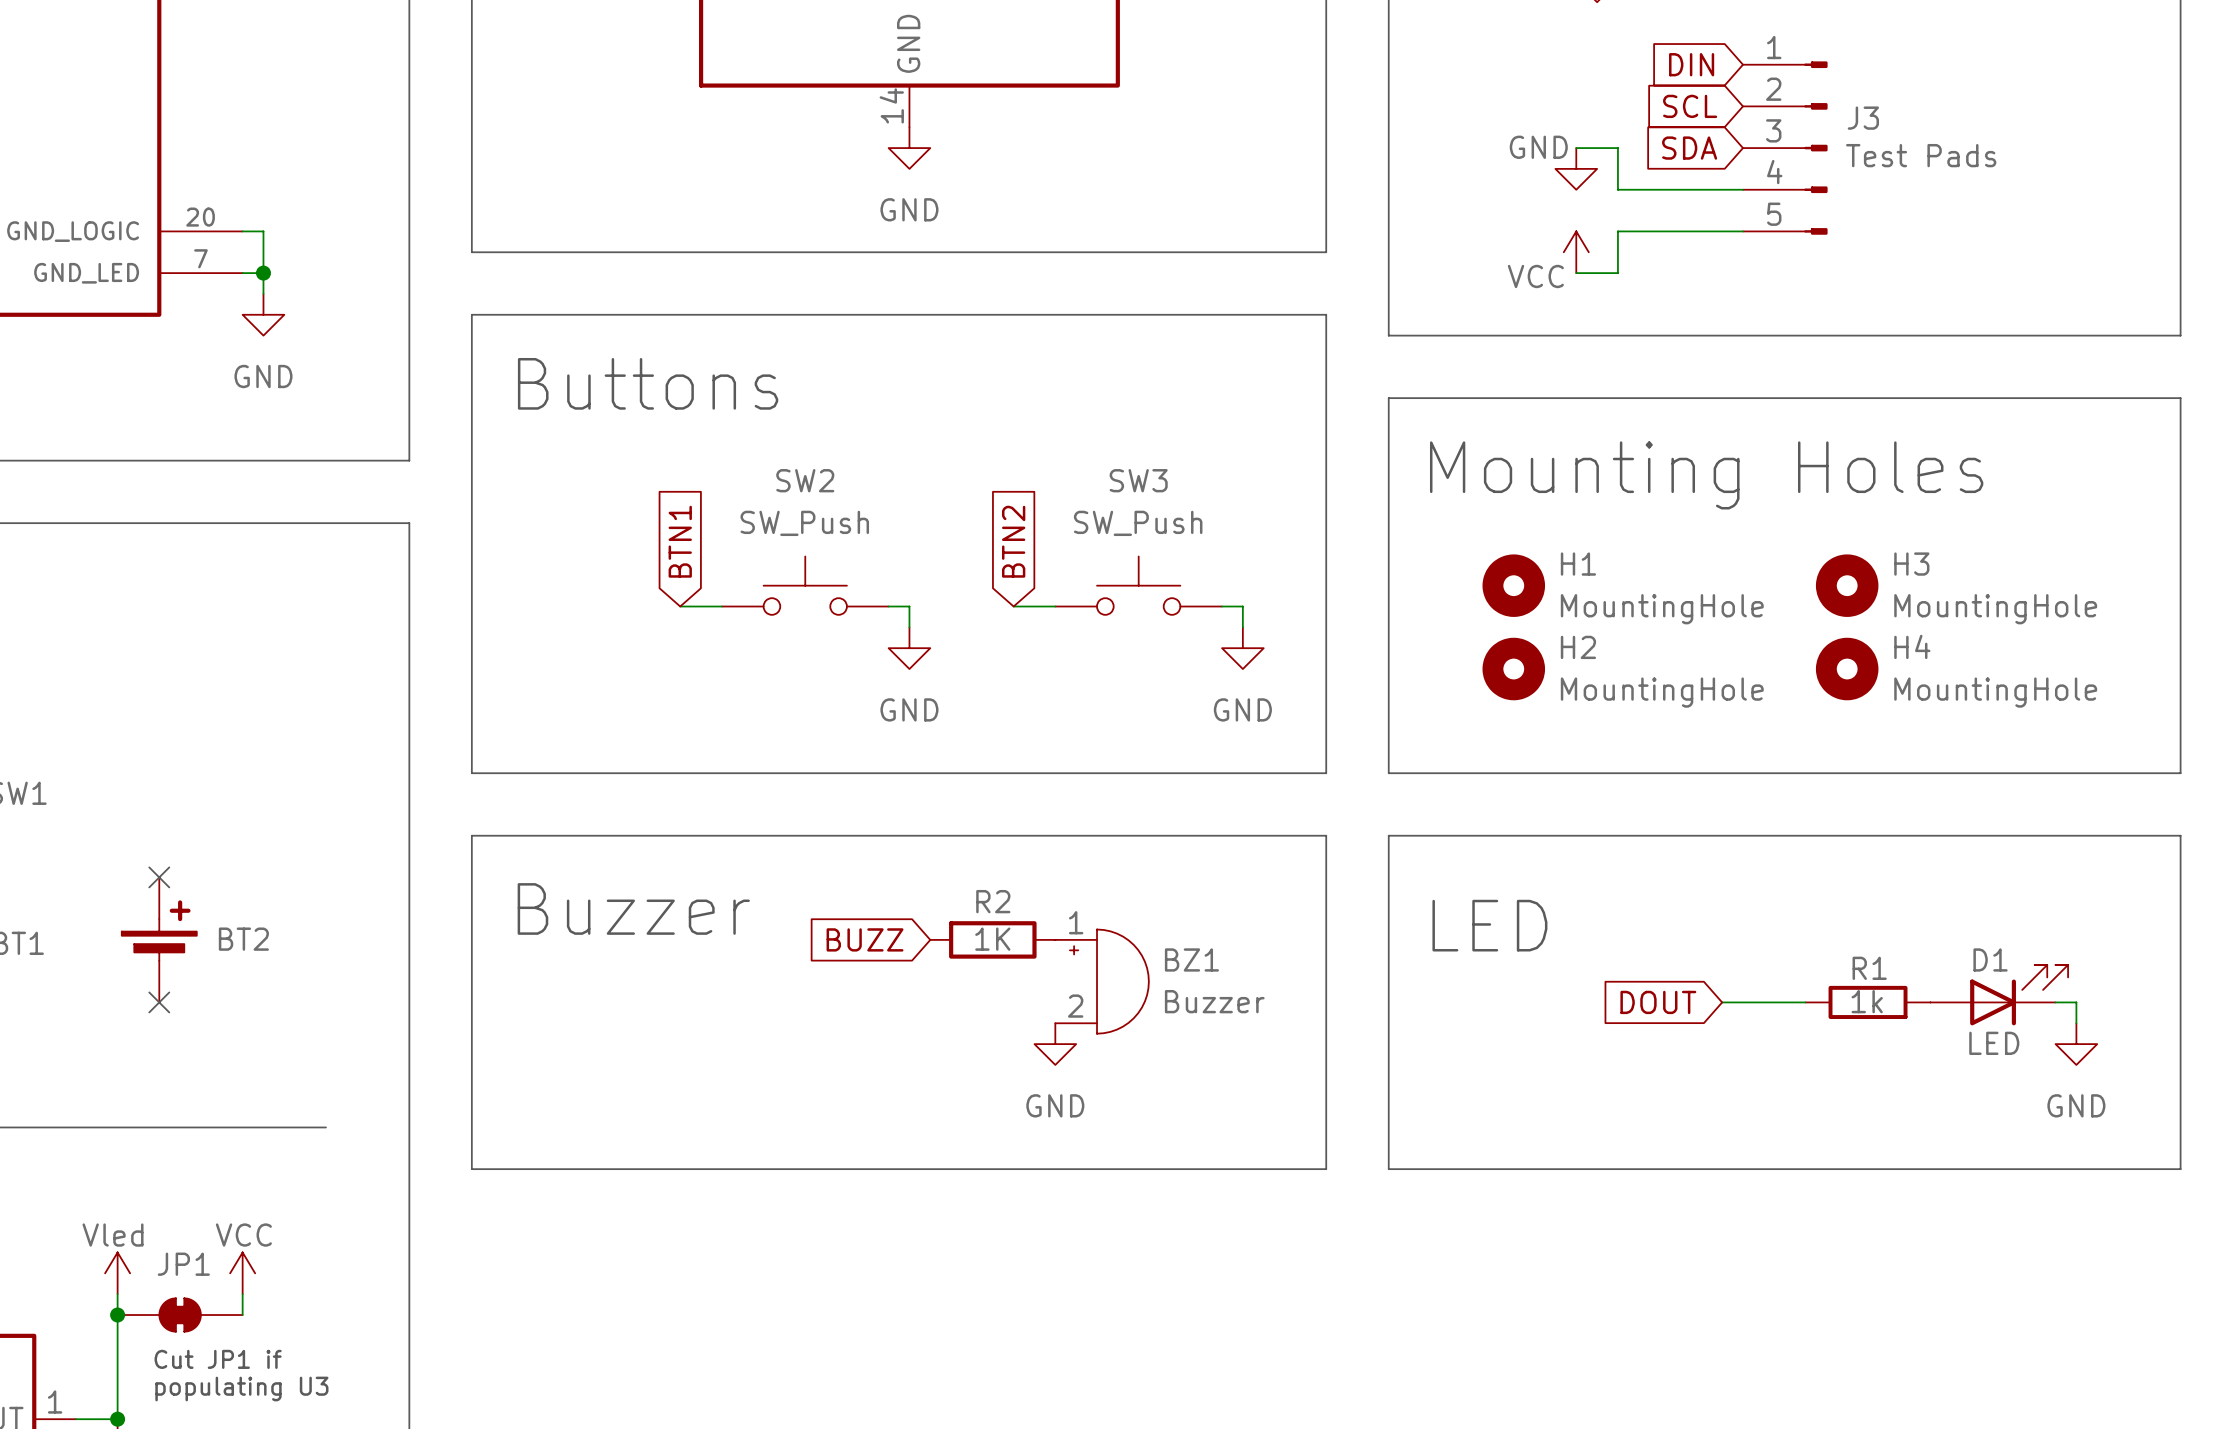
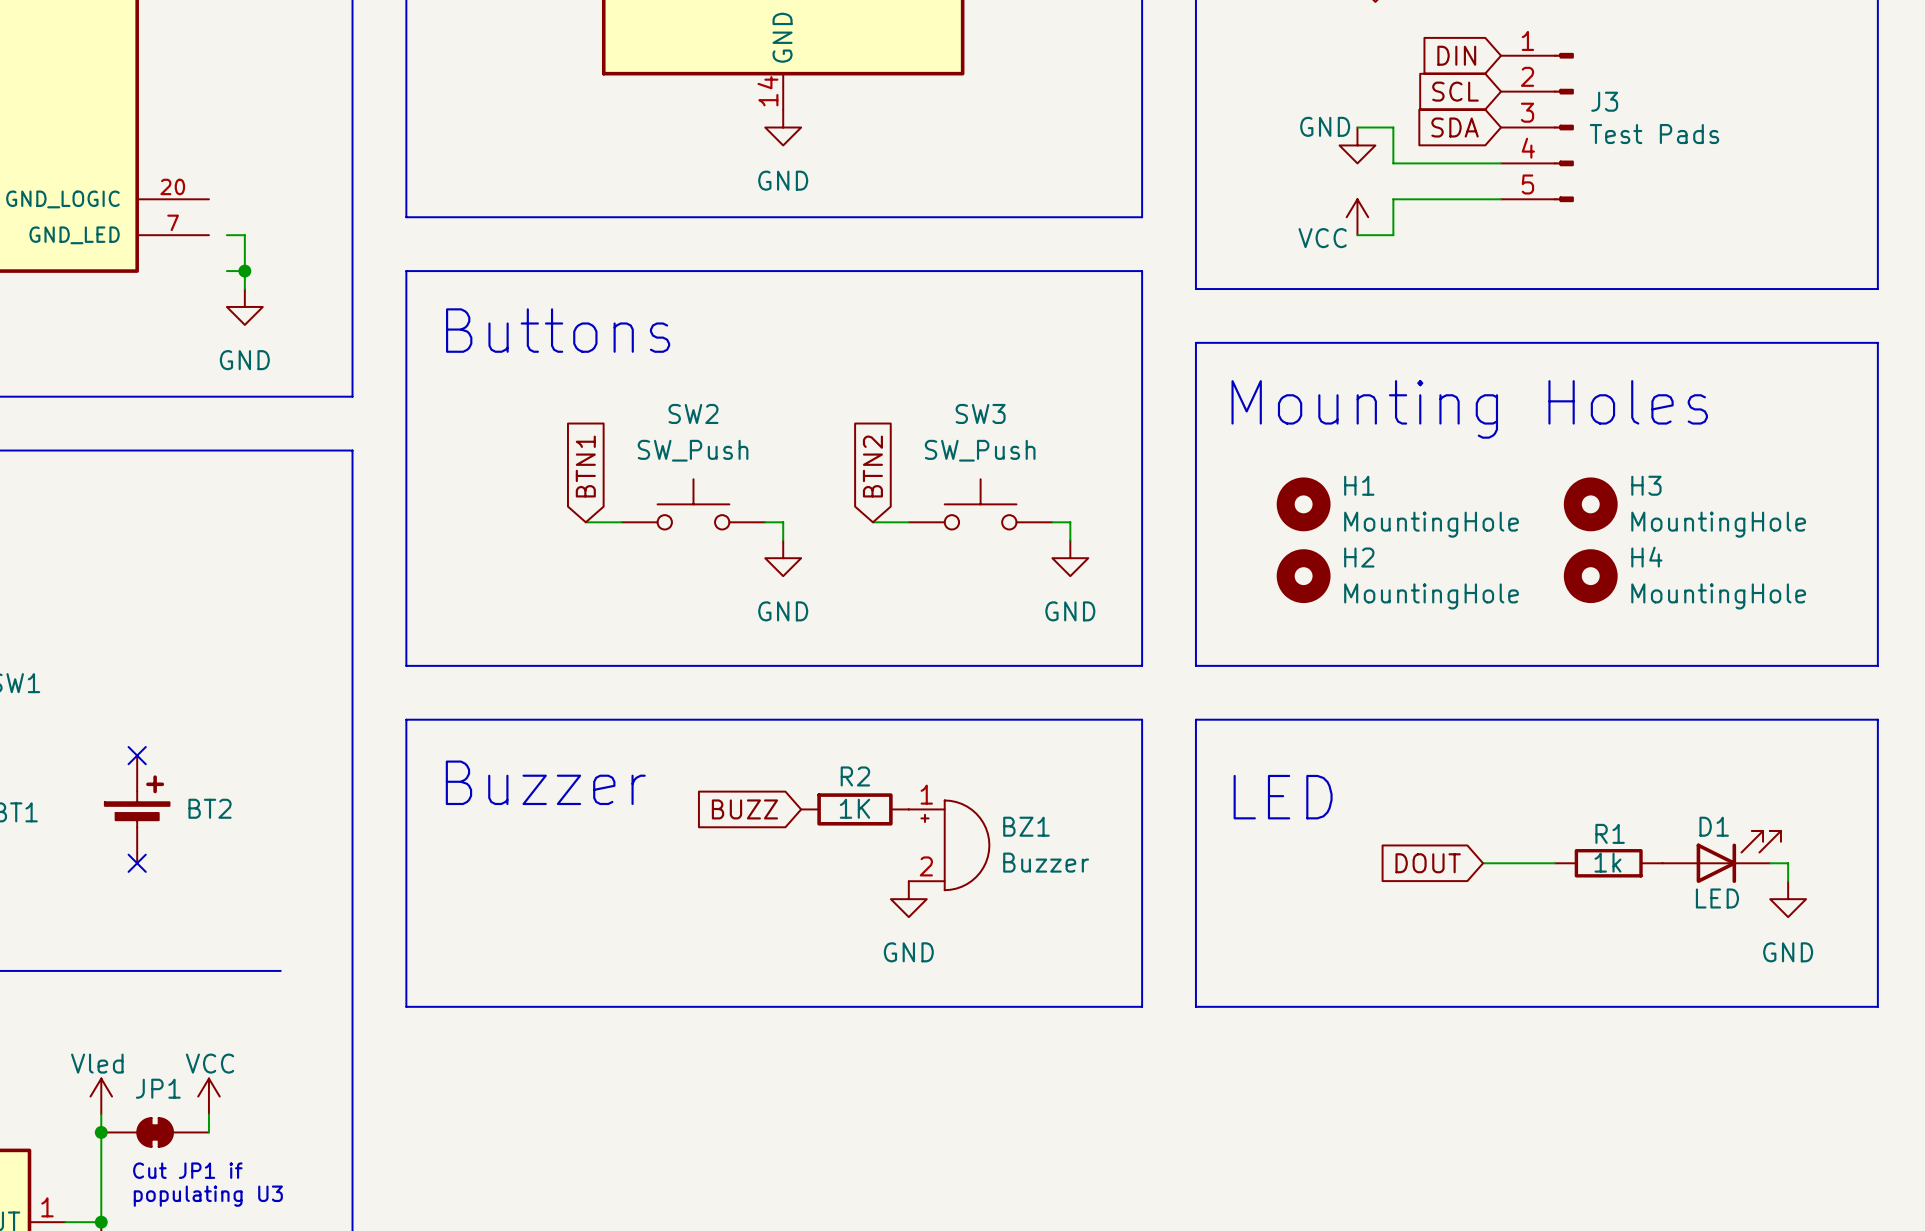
wire: (242, 231) (263, 231) (263, 293) -> none
wire: (242, 273) (263, 273) -> (244, 289) (244, 235) (226, 235)
junction position: (263, 273) -> (244, 271)
power symbol position: GND (263, 314) -> GND (244, 306)

